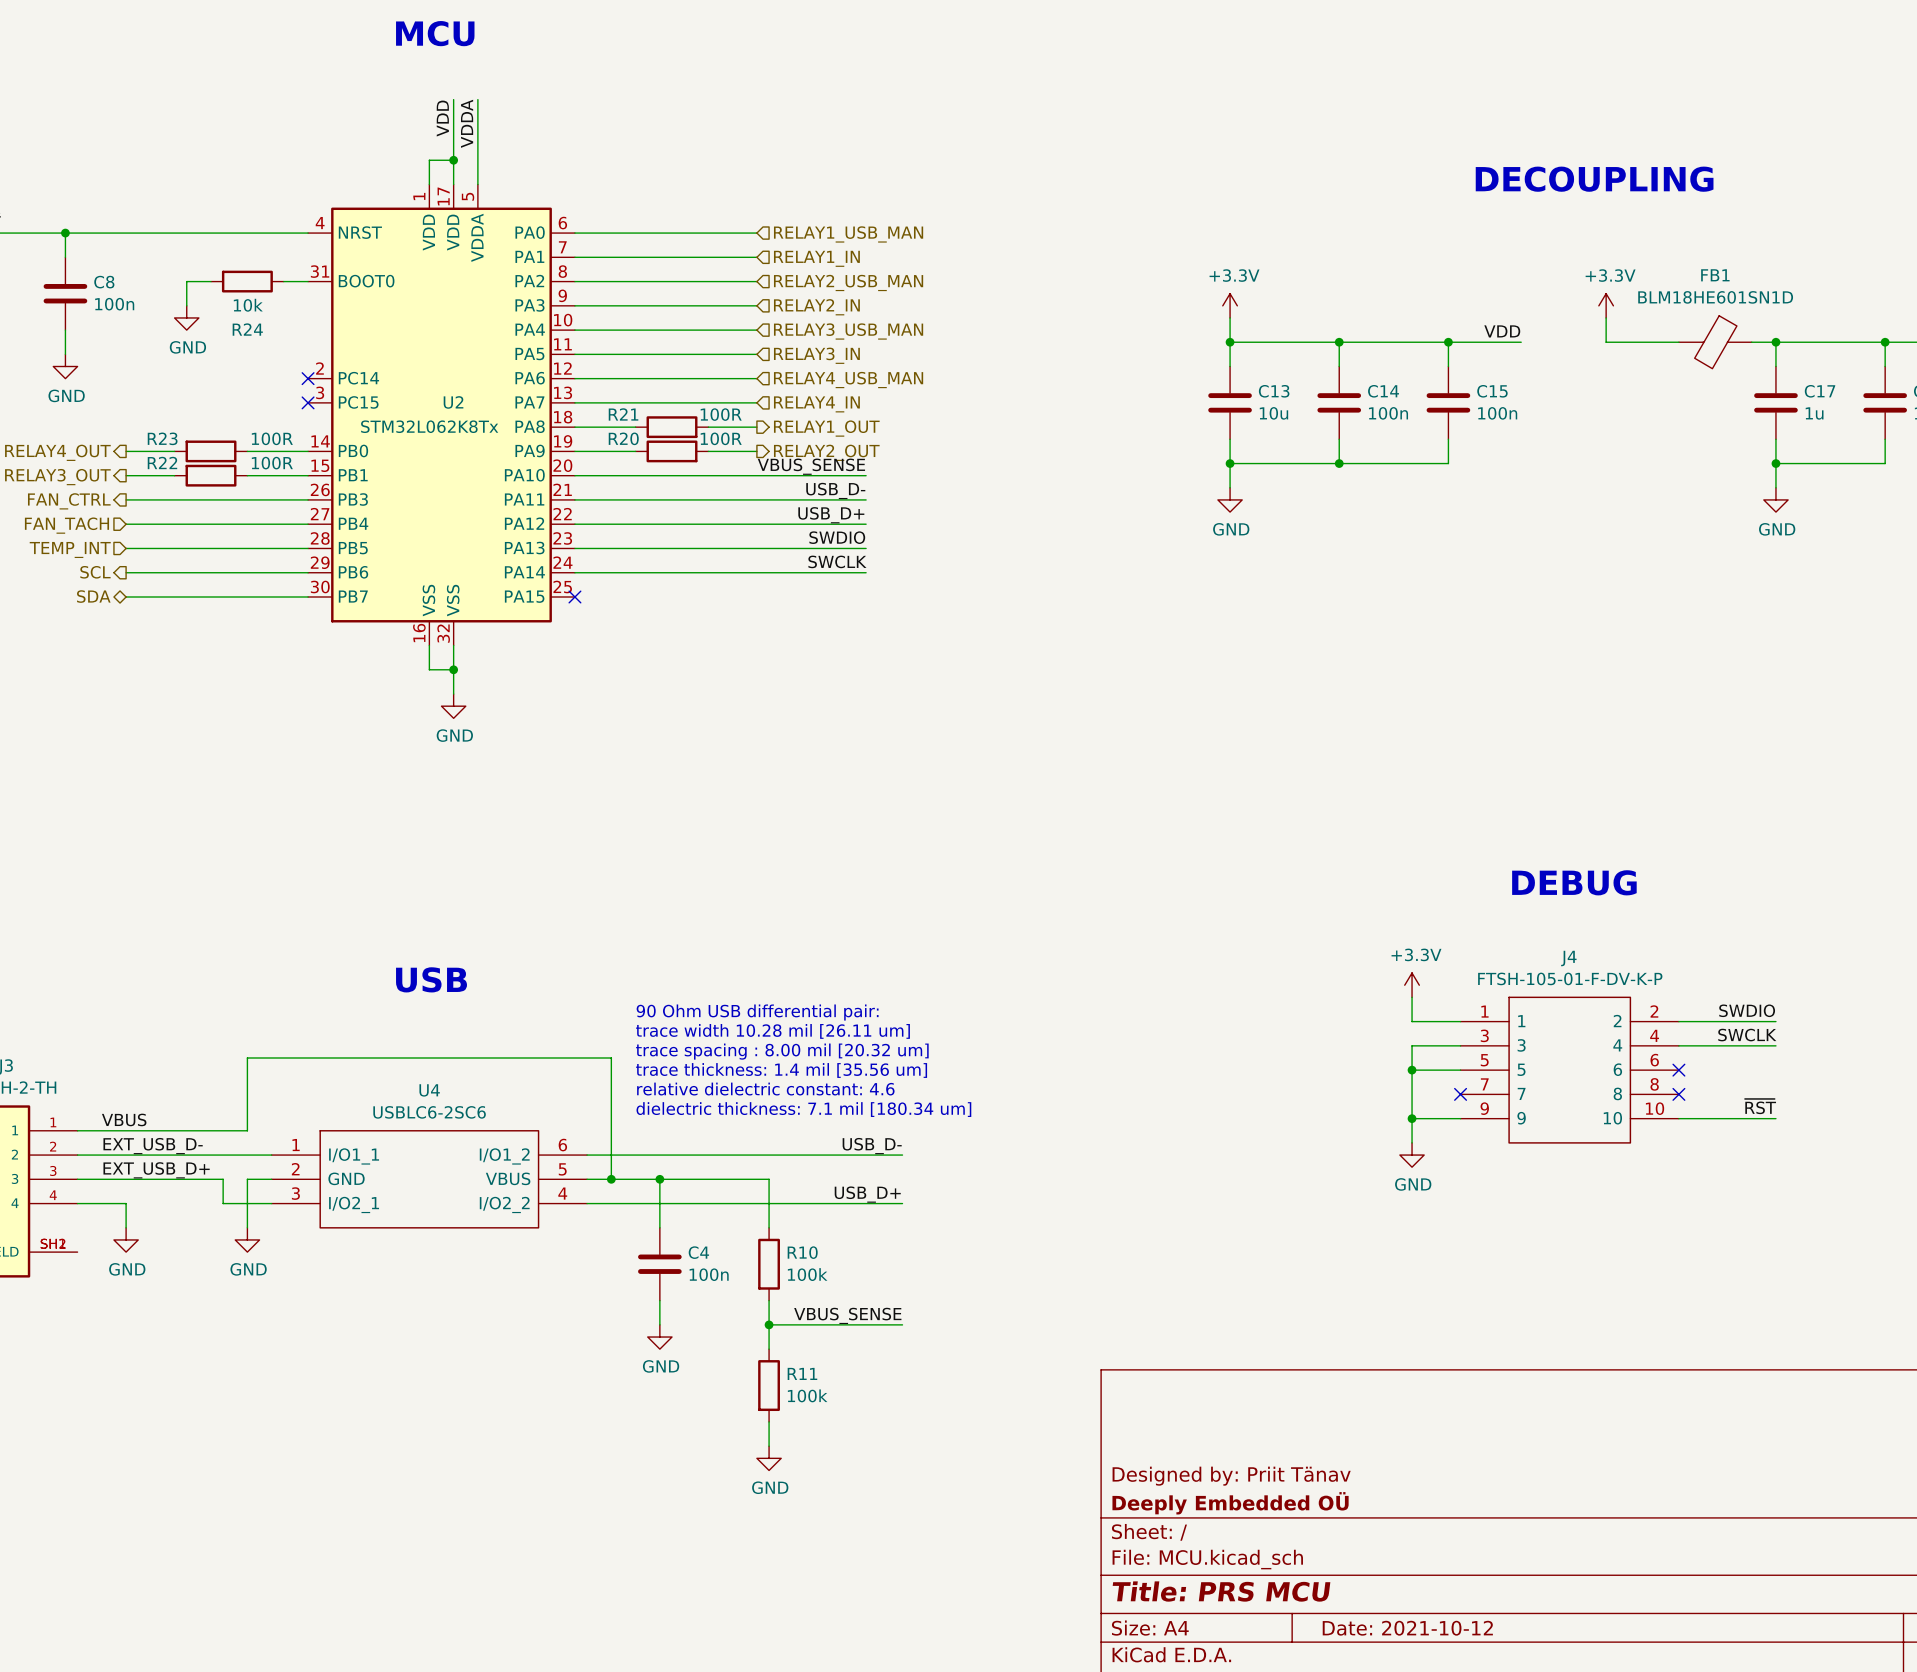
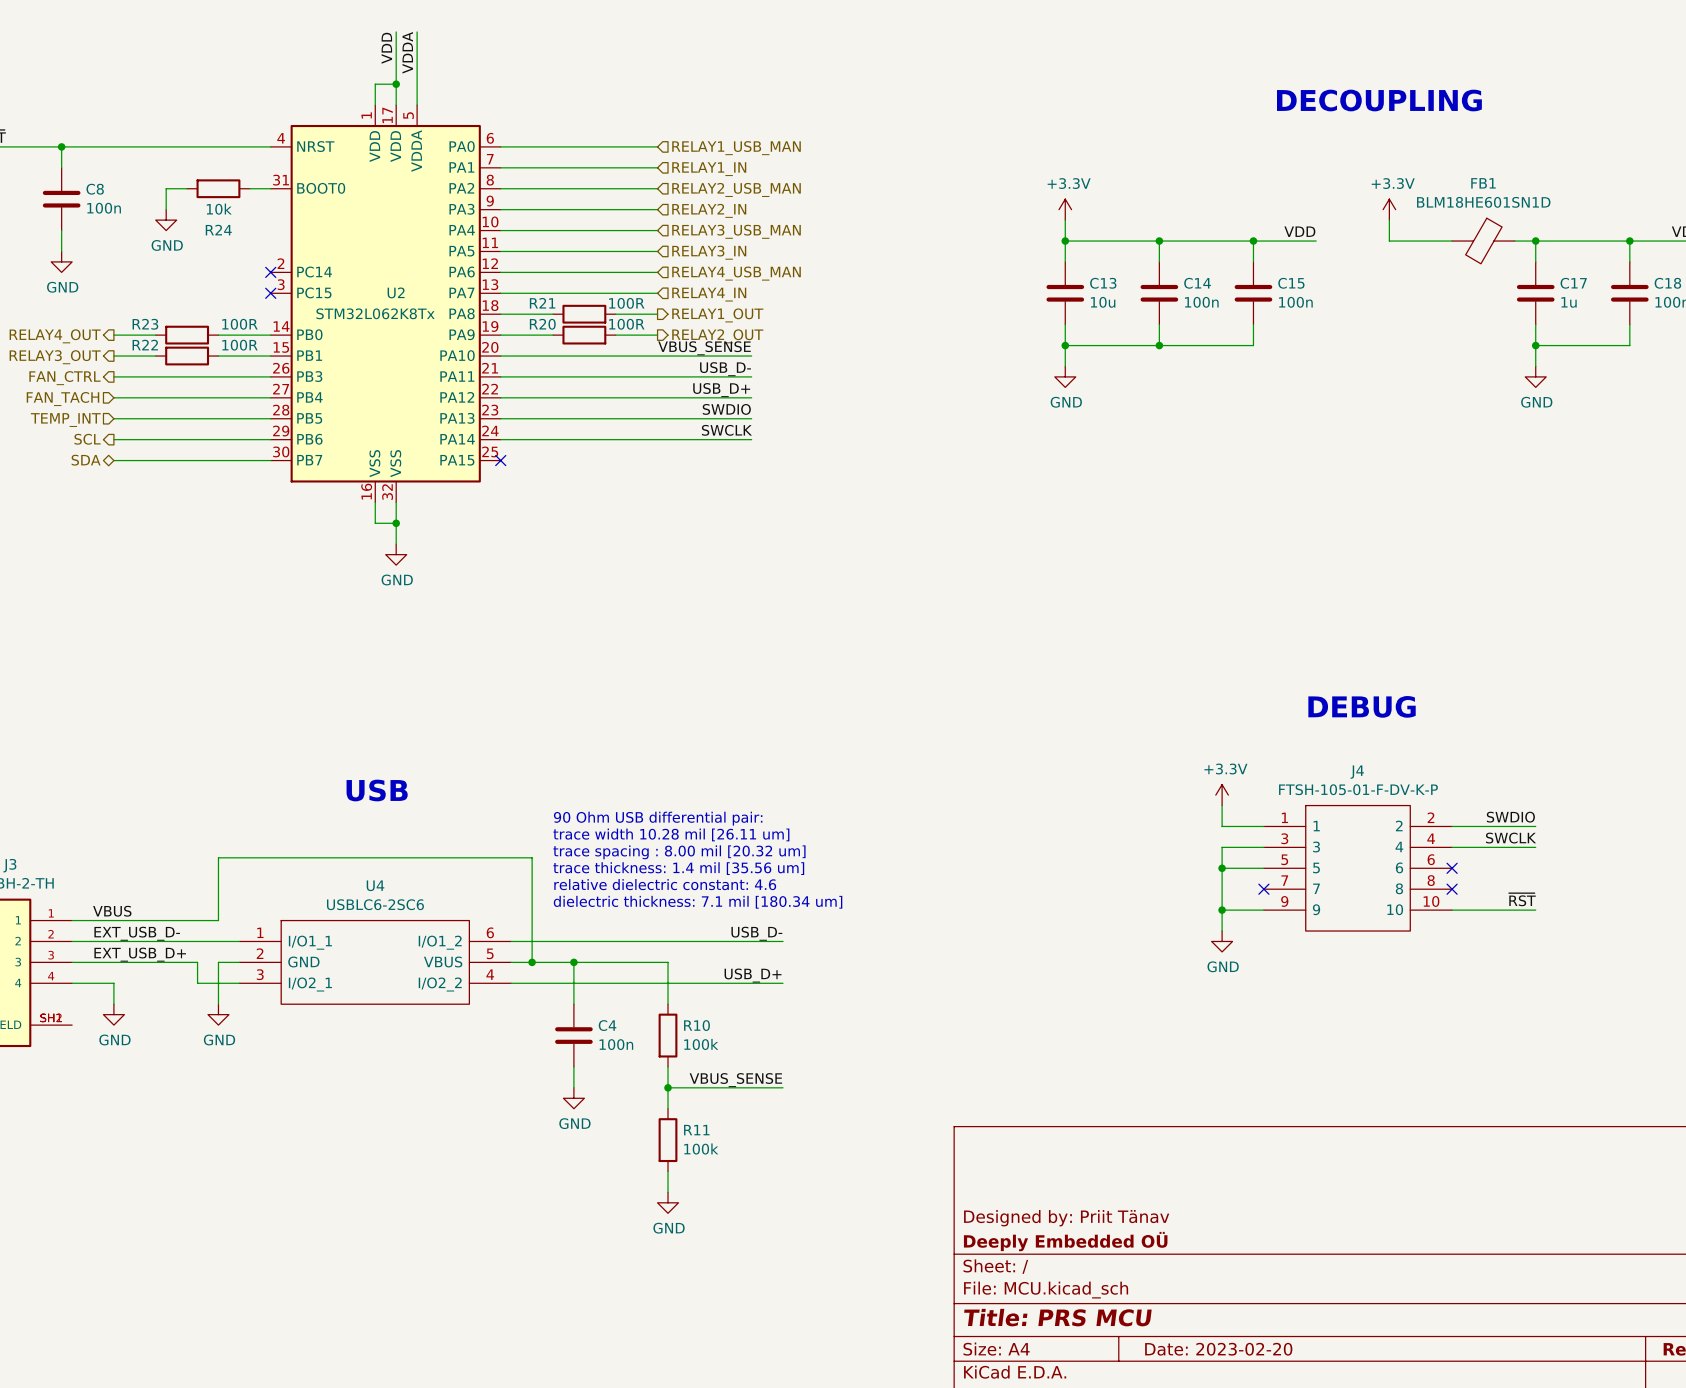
title block: Date: 2021-10-12 (1407, 1628) -> Date: 2023-02-20 (1218, 1349)

